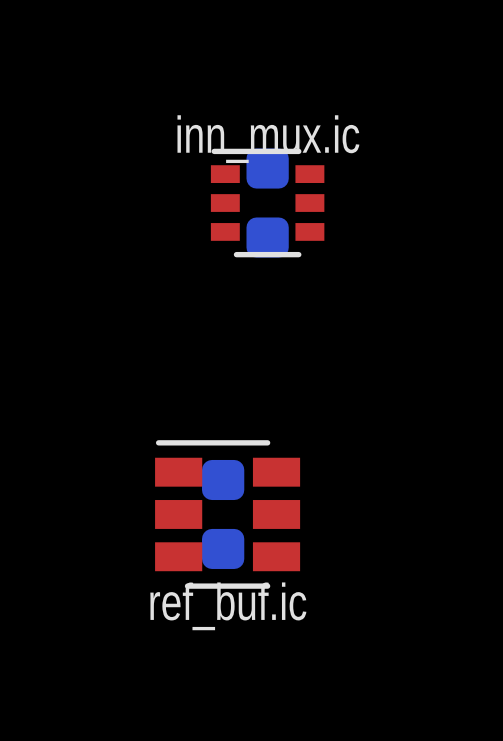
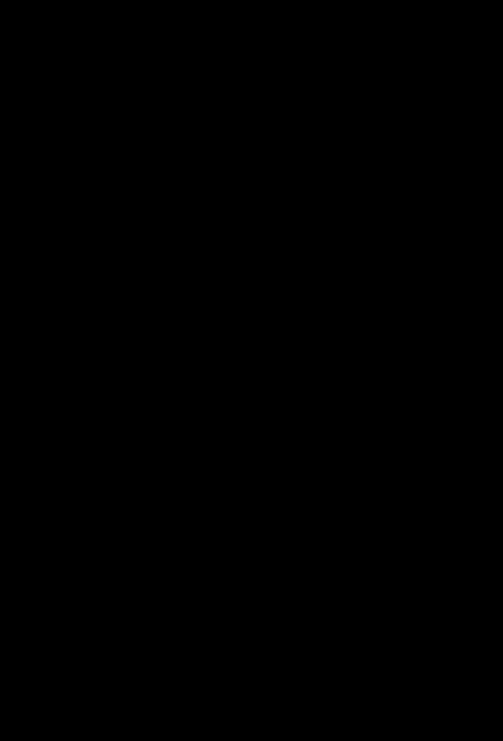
inn_mux.ic: (267, 203) -> none
part: (267, 203) -> none
part: (223, 514) -> none
ref_buf.ic: (227, 514) -> none

